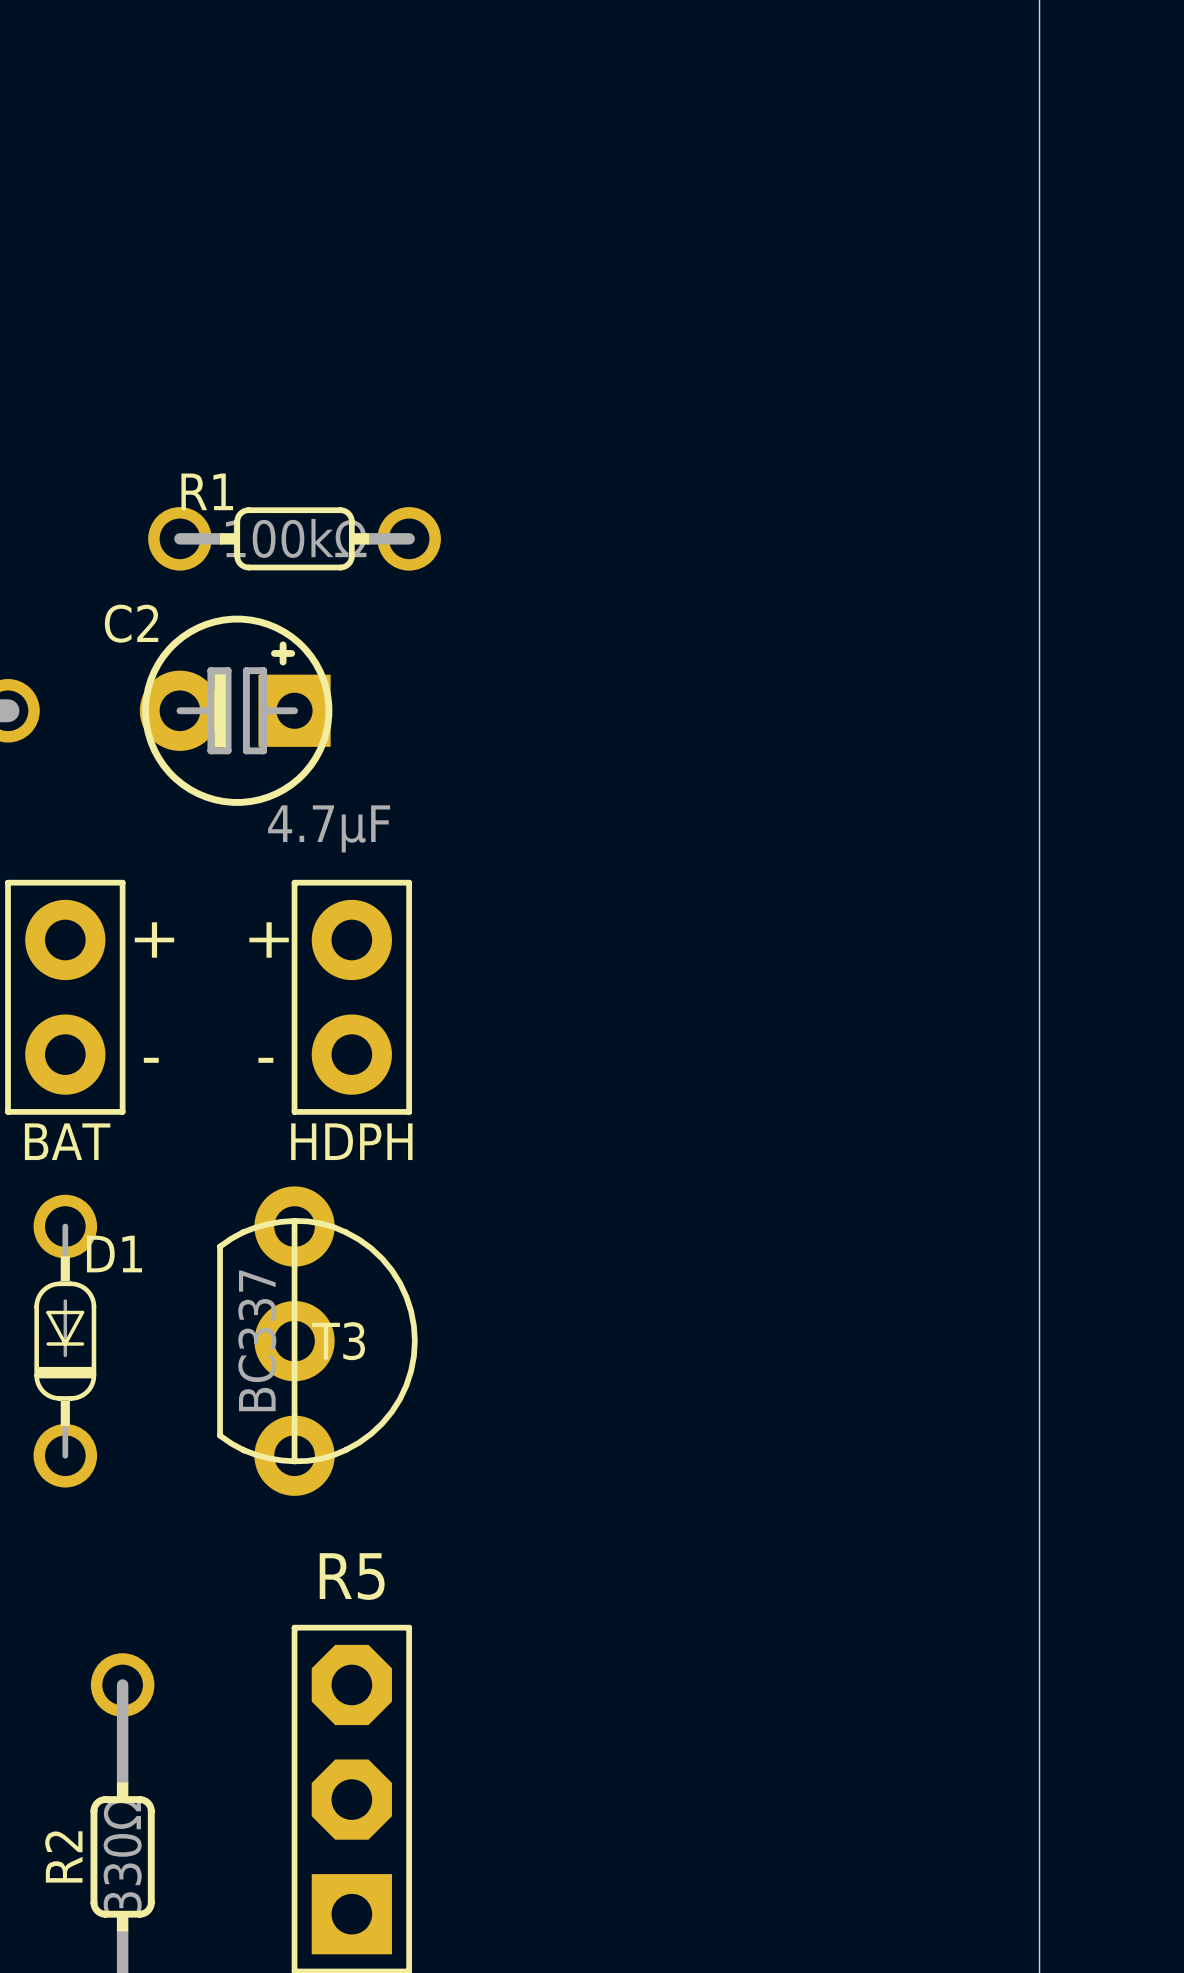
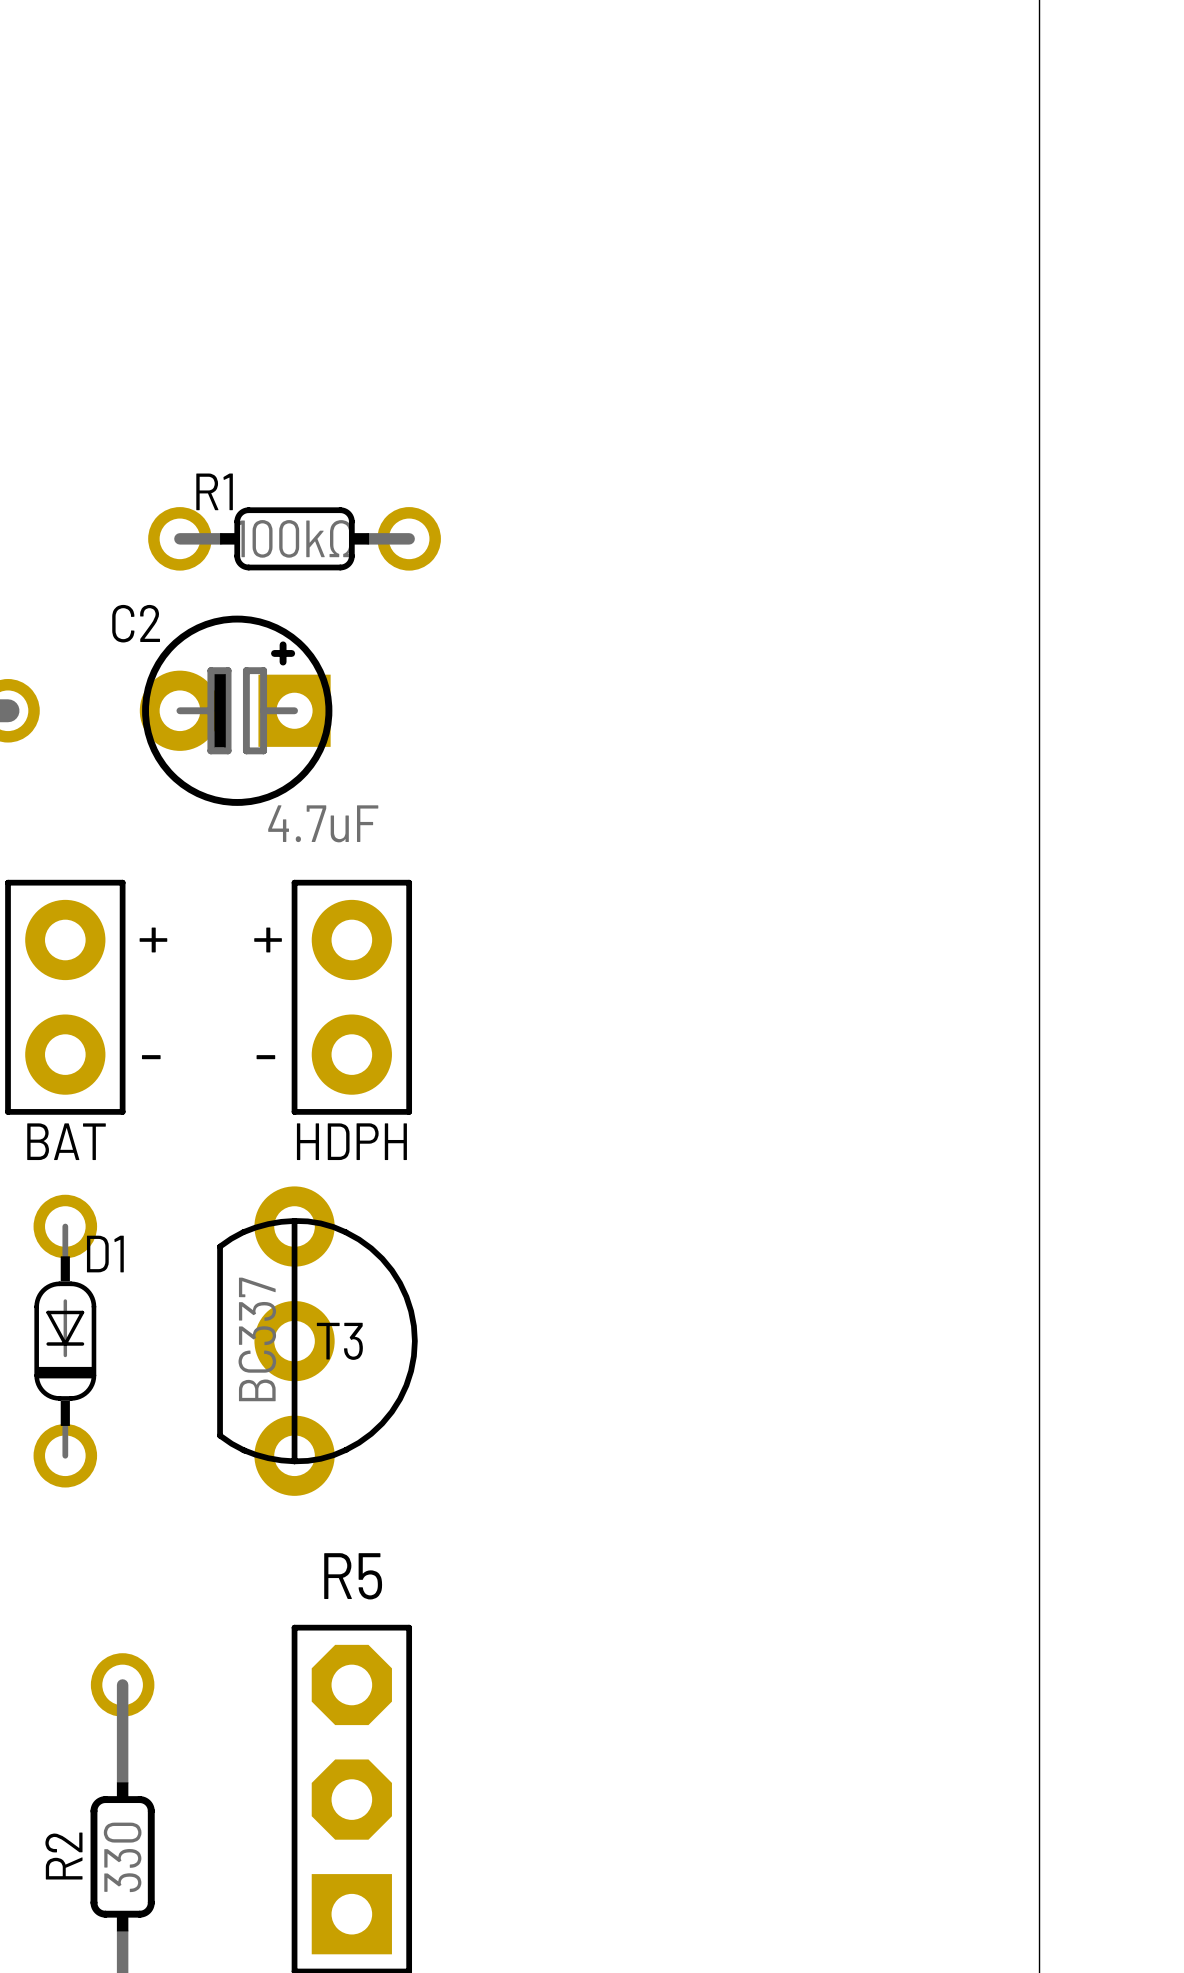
C2 value: 4.7μF (329, 828) -> 4.7uF (323, 823)
R2 value: 330Ω (122, 1856) -> 330 (122, 1857)

